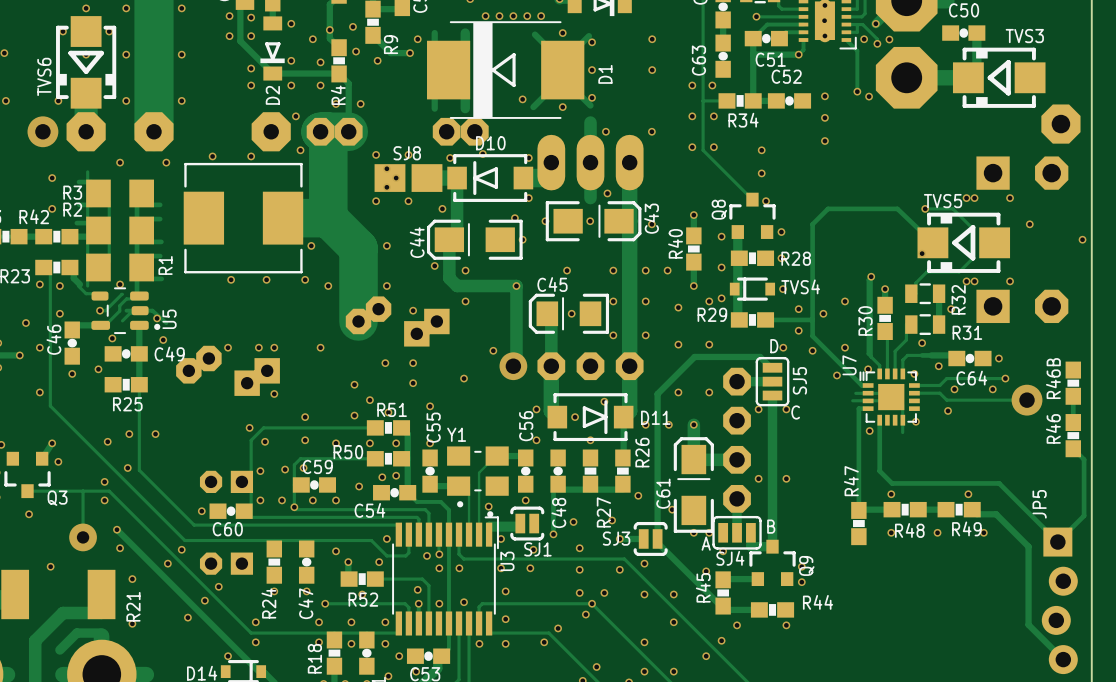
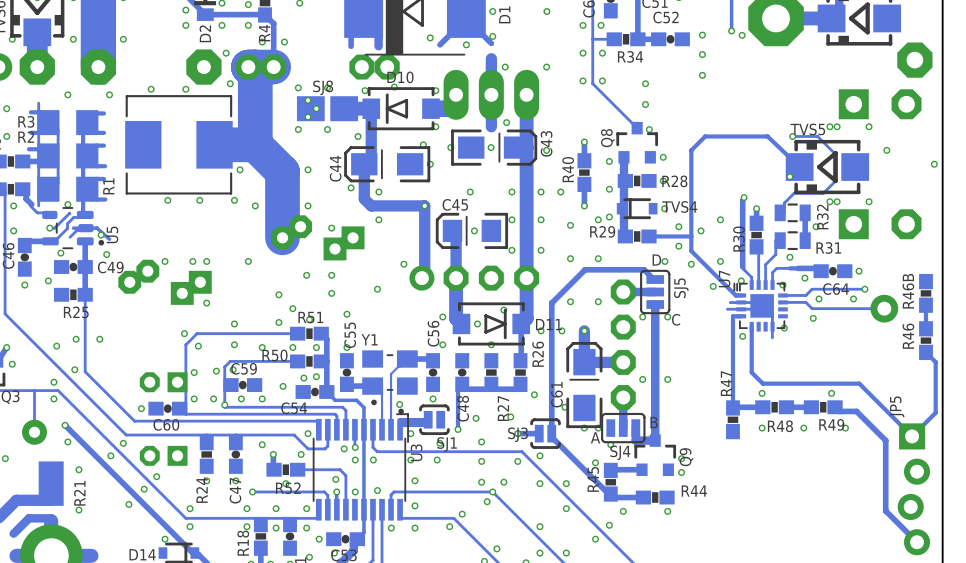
track: none -> (103, 113) (95, 113)

